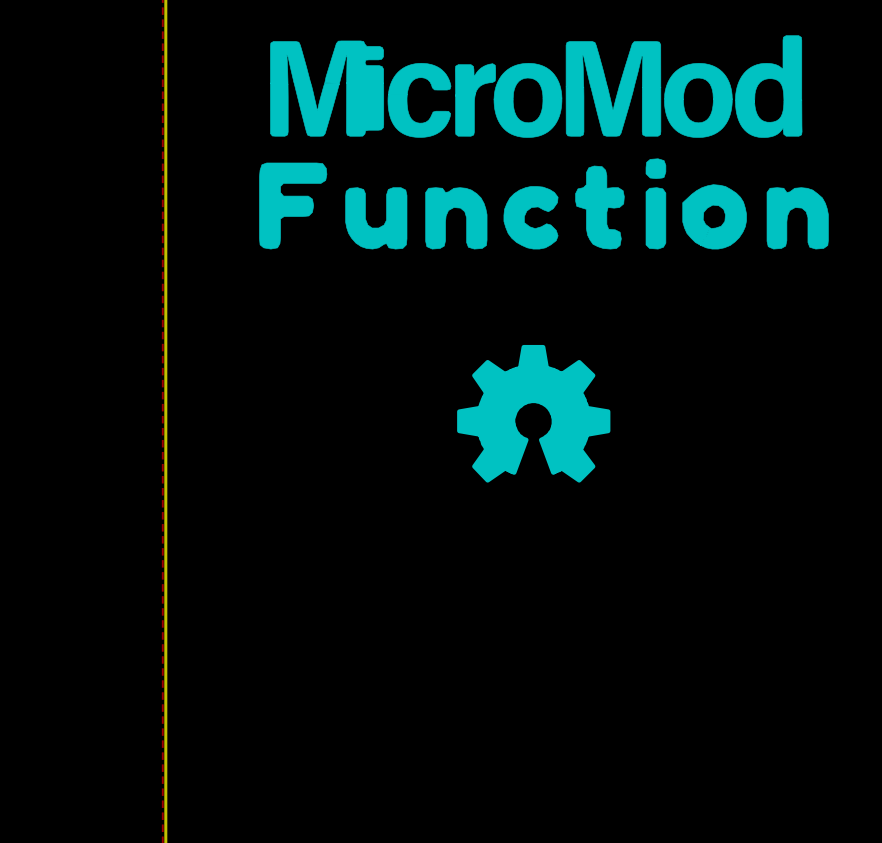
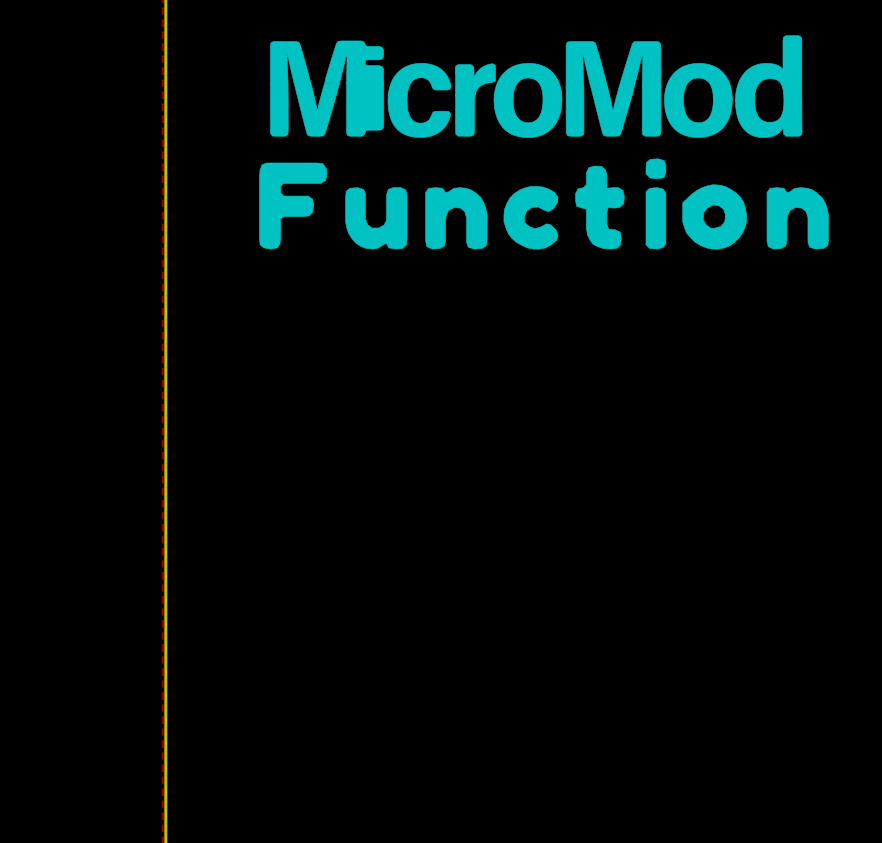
drawing: [457, 344, 611, 483] -> none

